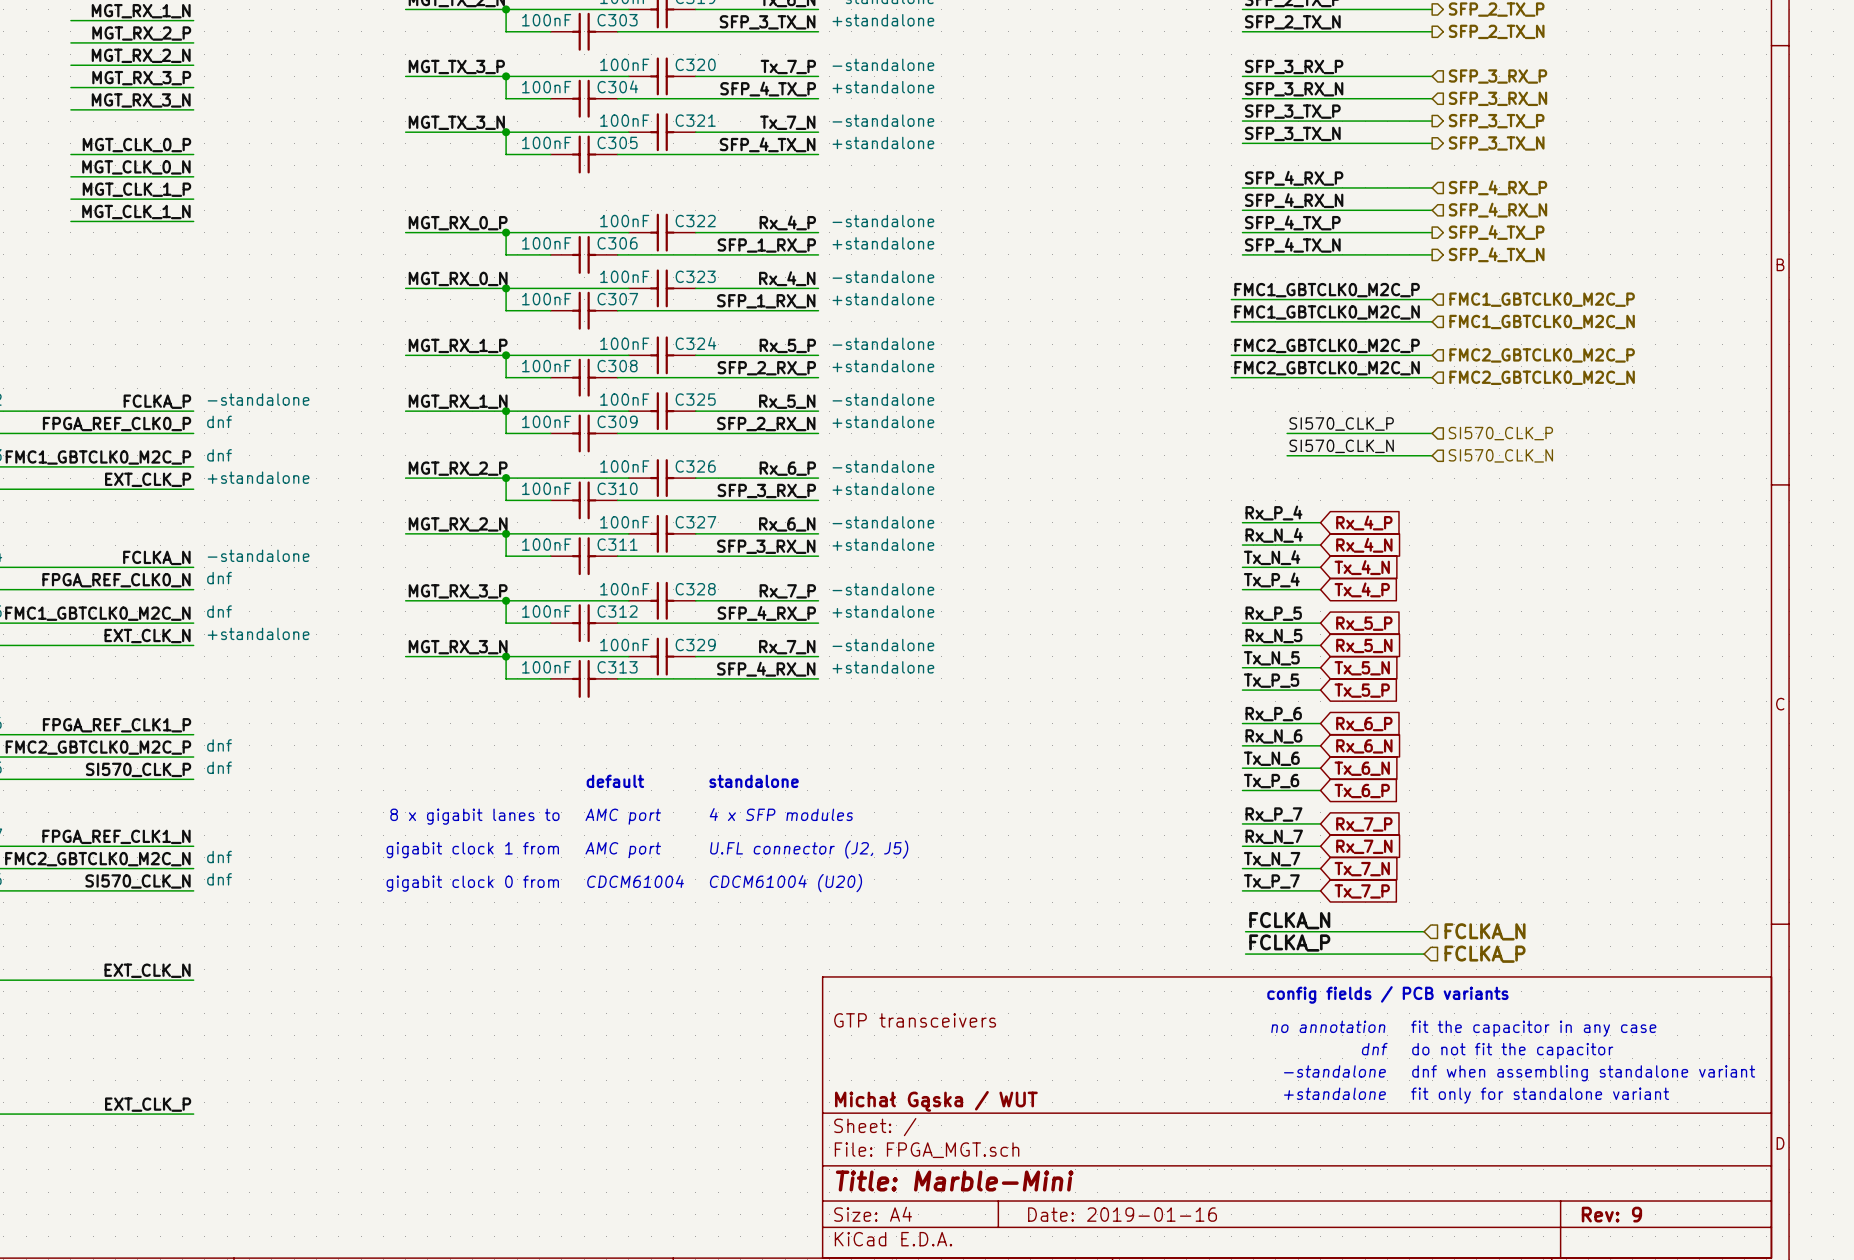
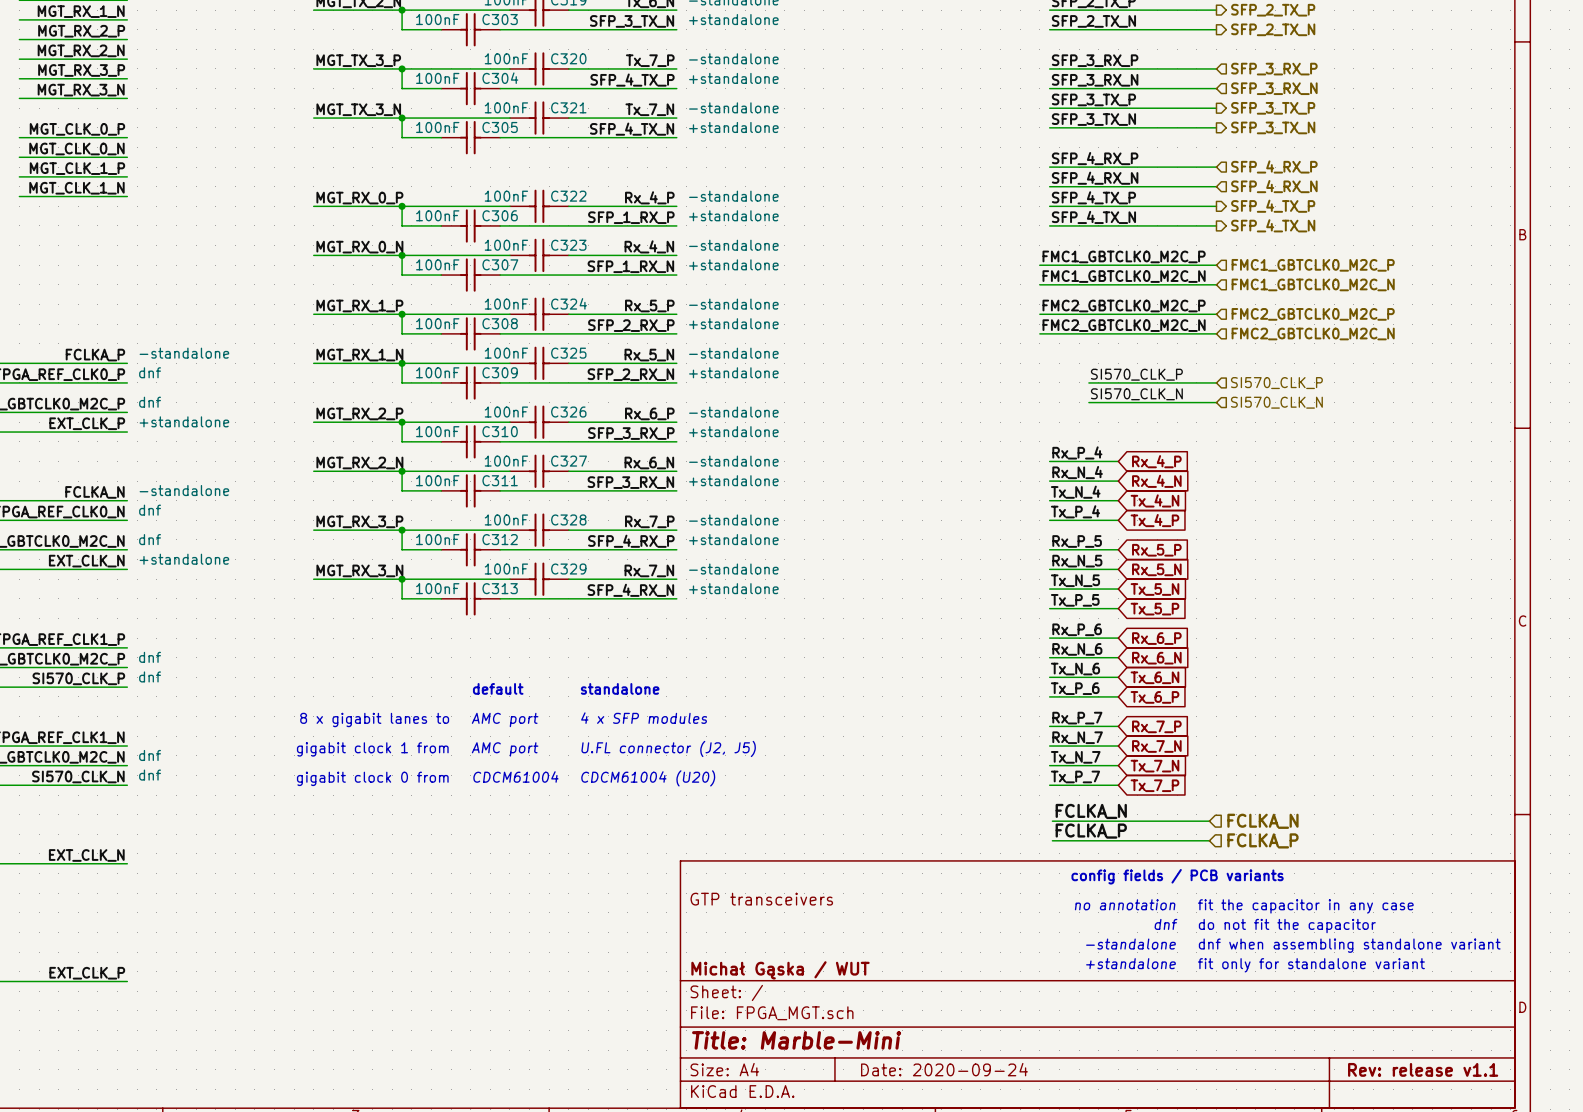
title block: Date: 2019-01-16 (1122, 1214) -> Date: 2020-09-24 (944, 1069)
title block: Rev: 9 (1611, 1214) -> Rev: release v1.1 (1423, 1069)

